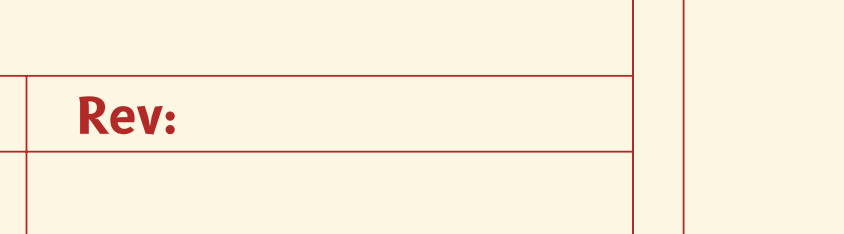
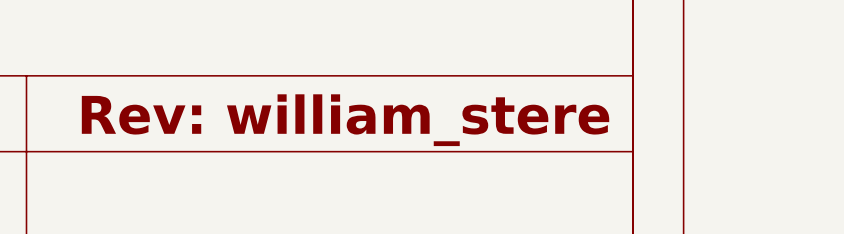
title block: Rev: (126, 115) -> Rev: william_stere (345, 120)

